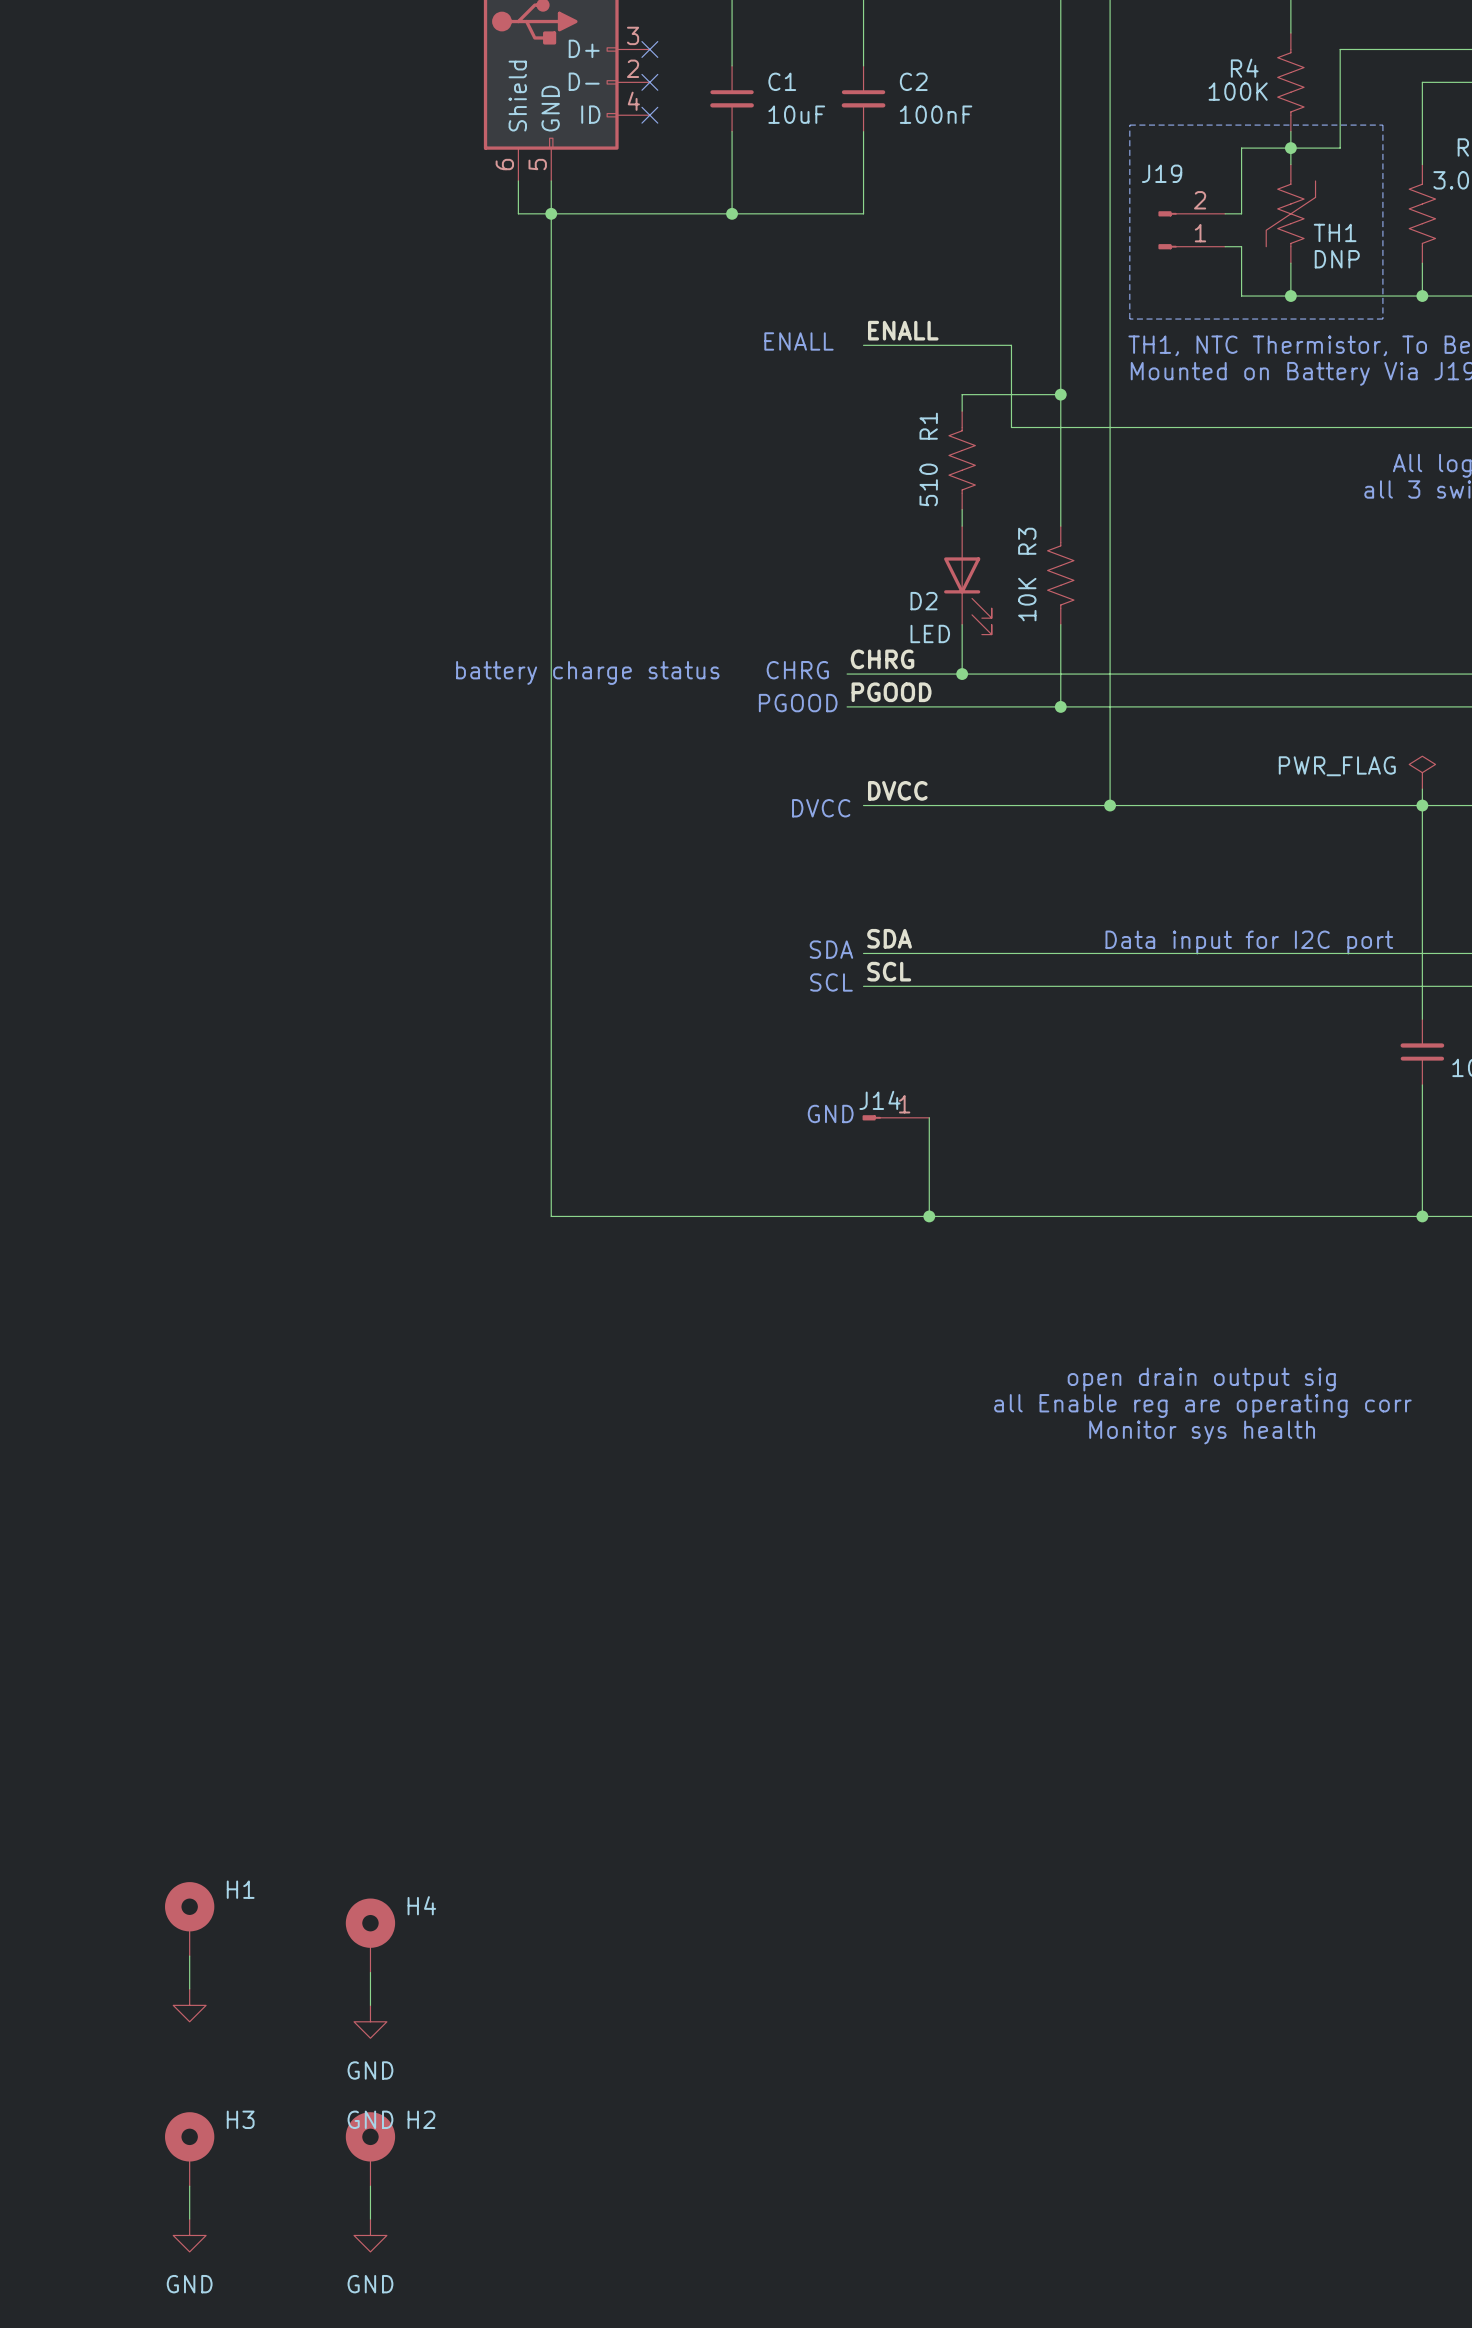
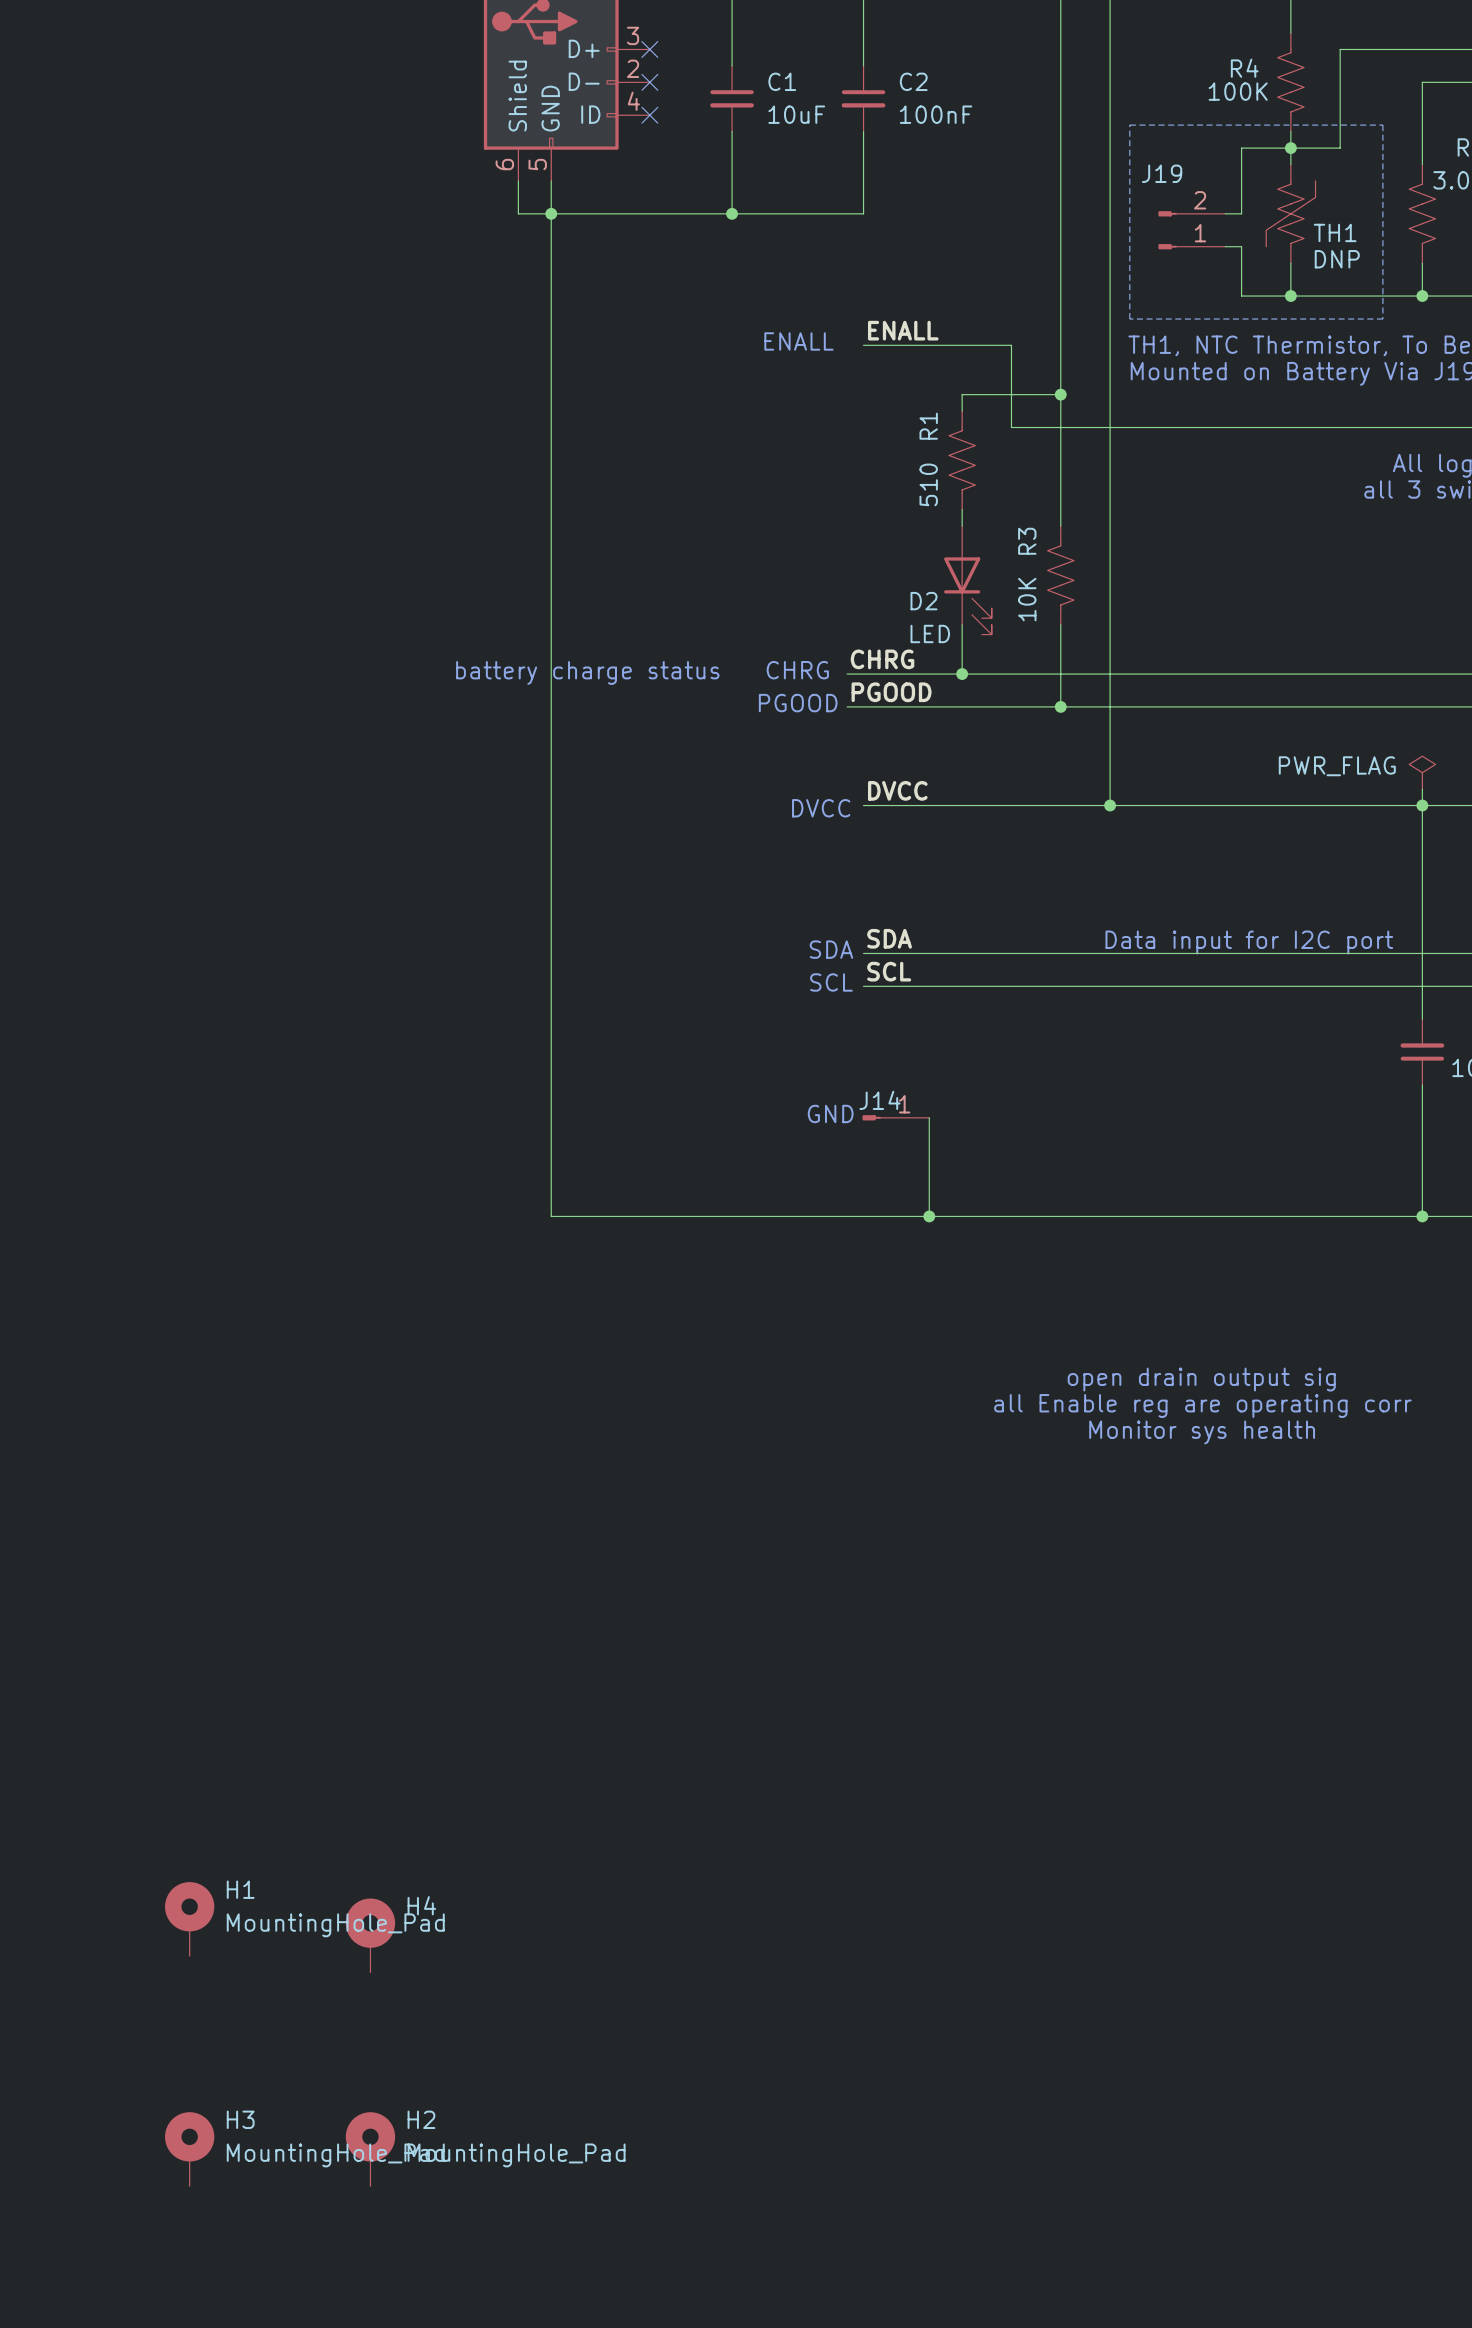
H1 value: none -> MountingHole_Pad (335, 1925)
wire: (189, 1956) (189, 1988) -> none
wire: (370, 1972) (370, 2005) -> none
power symbol: GND (189, 2005) -> none
power symbol: GND (370, 2021) -> none
H3 value: none -> MountingHole_Pad (335, 2155)
H2 value: none -> MountingHole_Pad (516, 2155)
wire: (189, 2186) (189, 2219) -> none
wire: (370, 2186) (370, 2219) -> none
power symbol: GND (189, 2235) -> none
power symbol: GND (370, 2235) -> none

